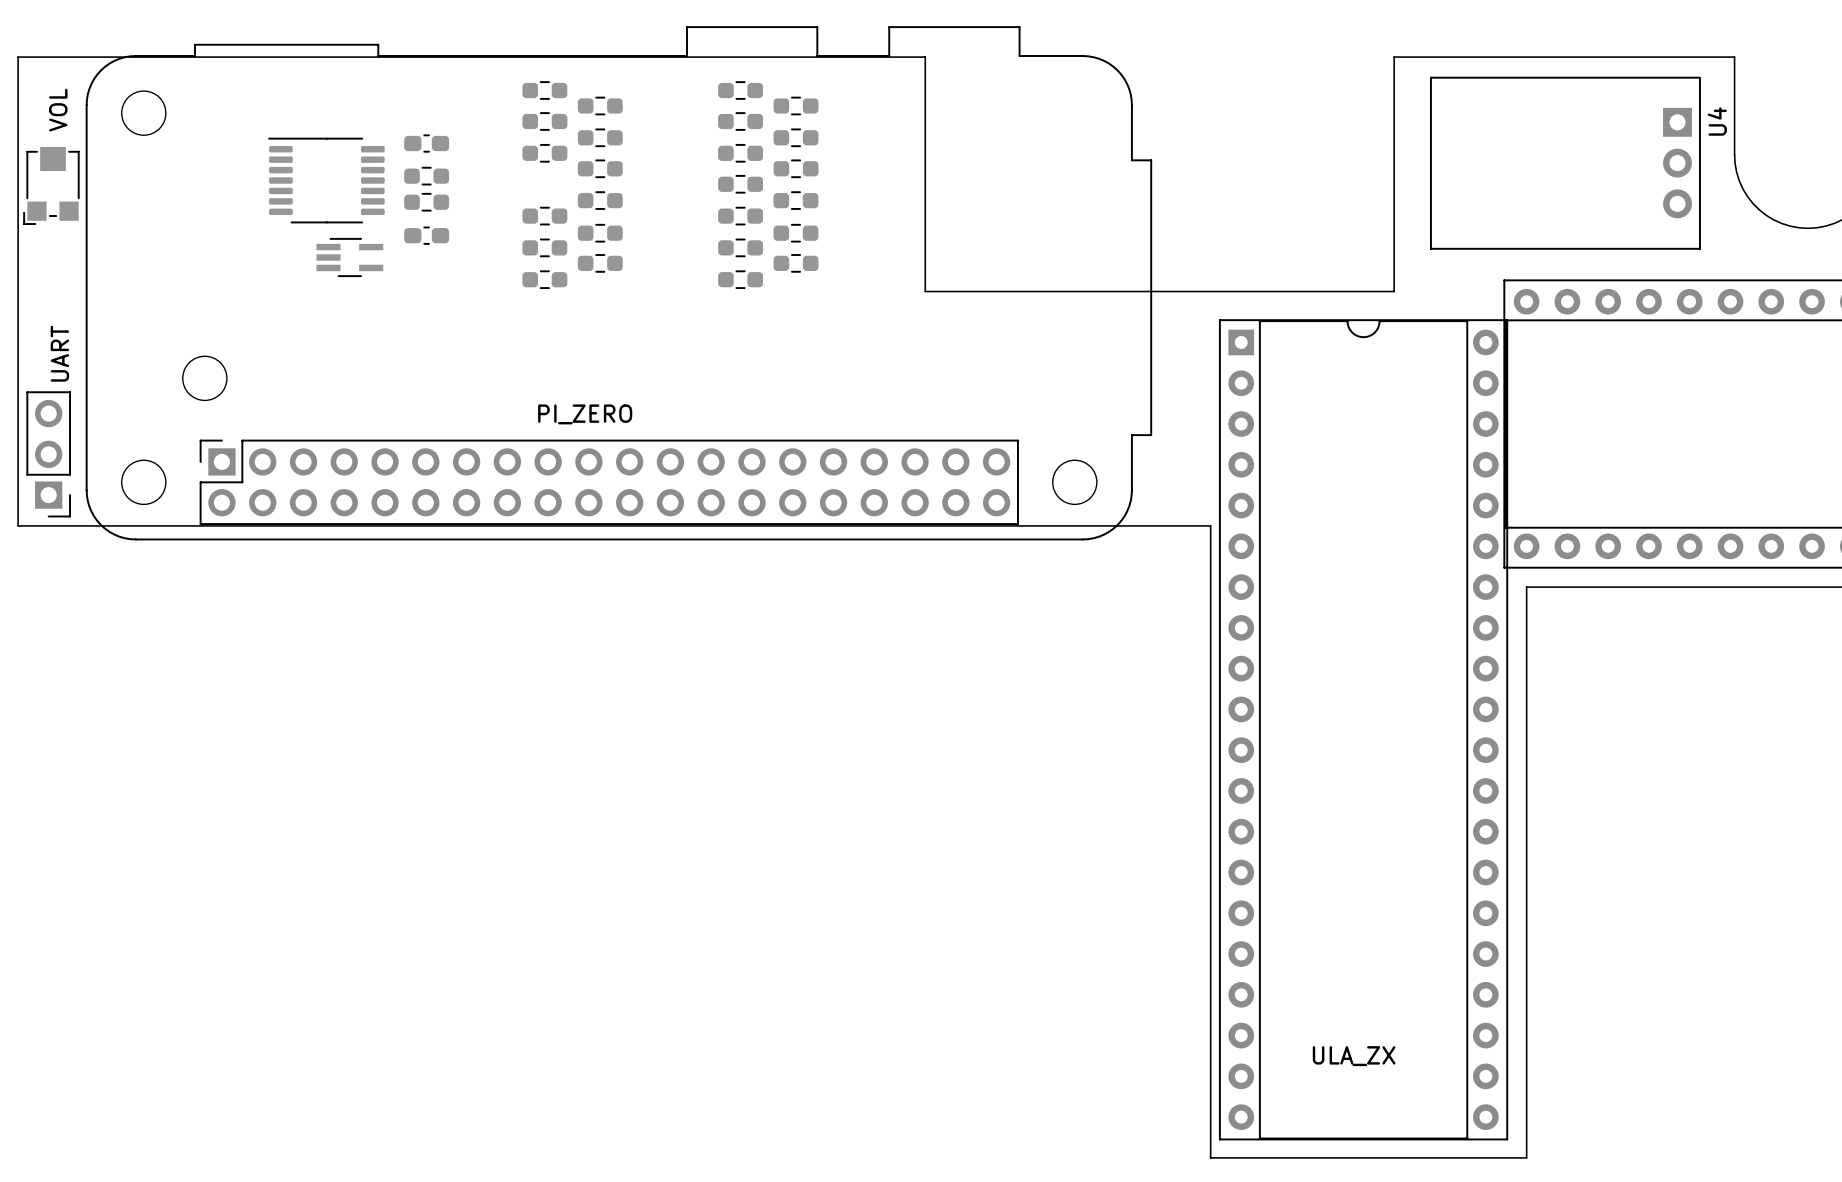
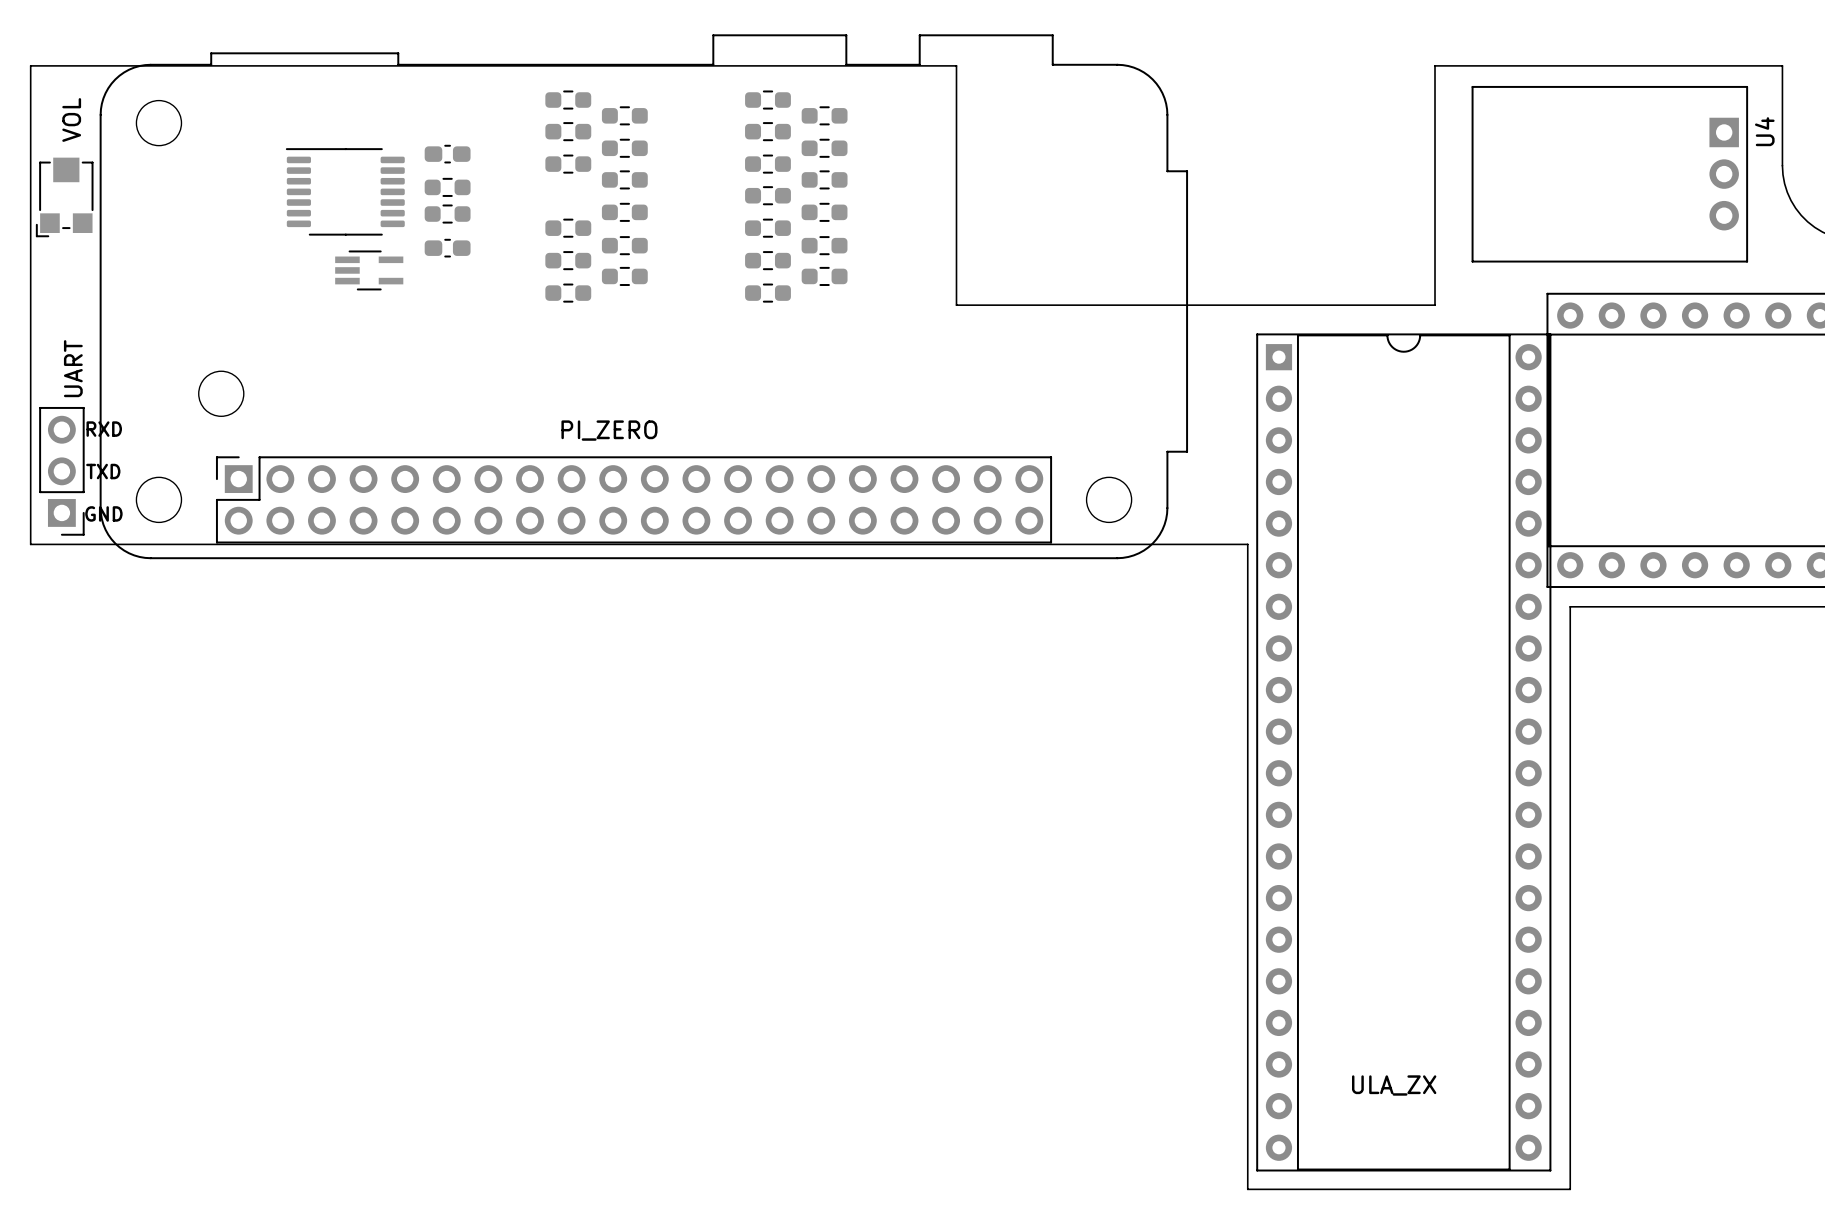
text: none -> RXD (104, 429)
text: none -> TXD (103, 471)
text: none -> GND (103, 513)

